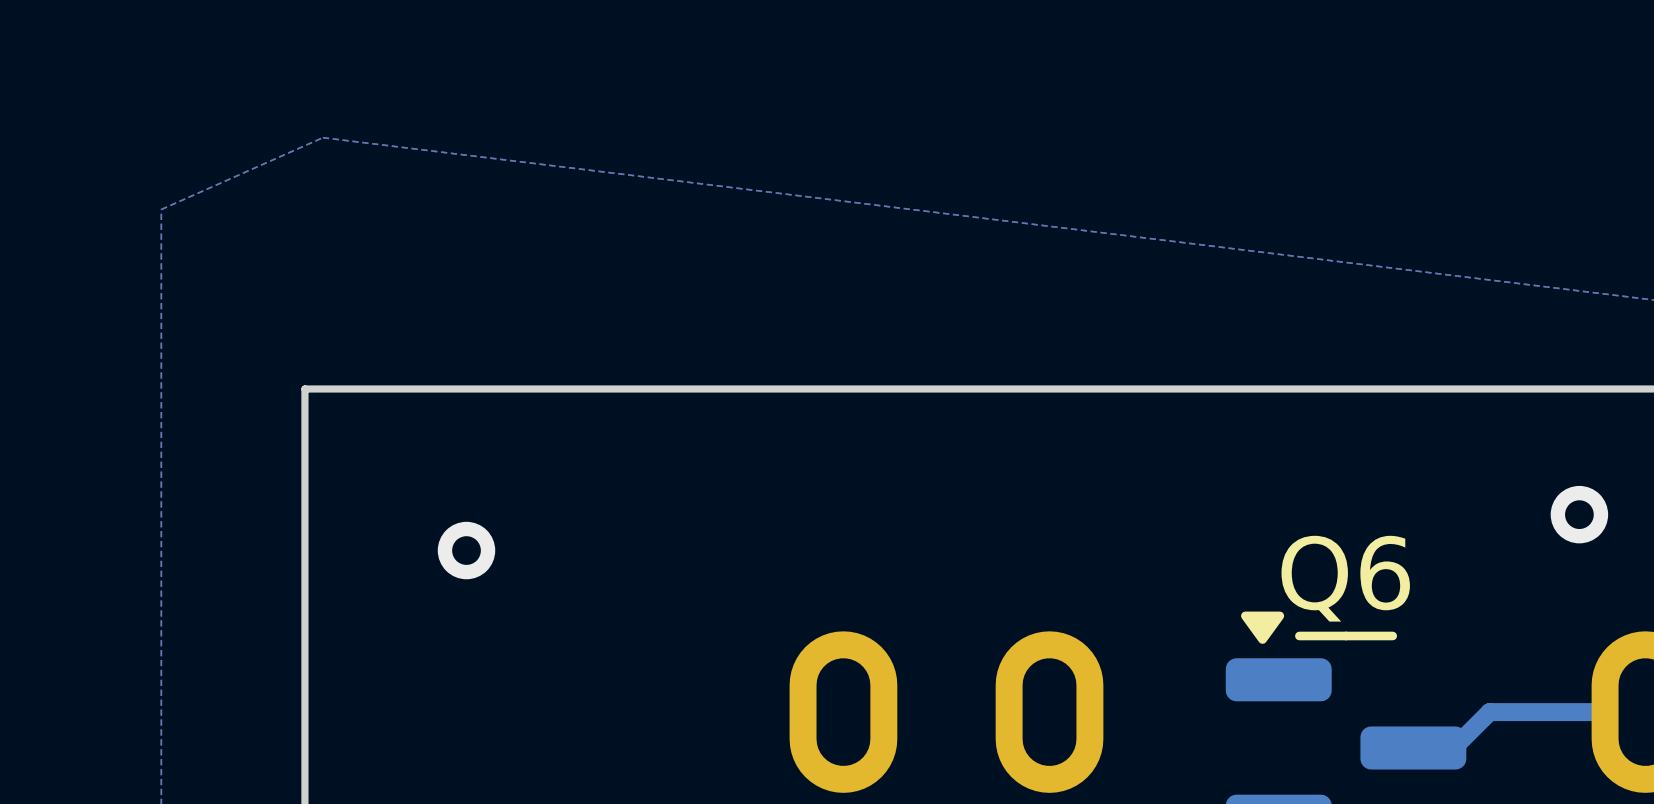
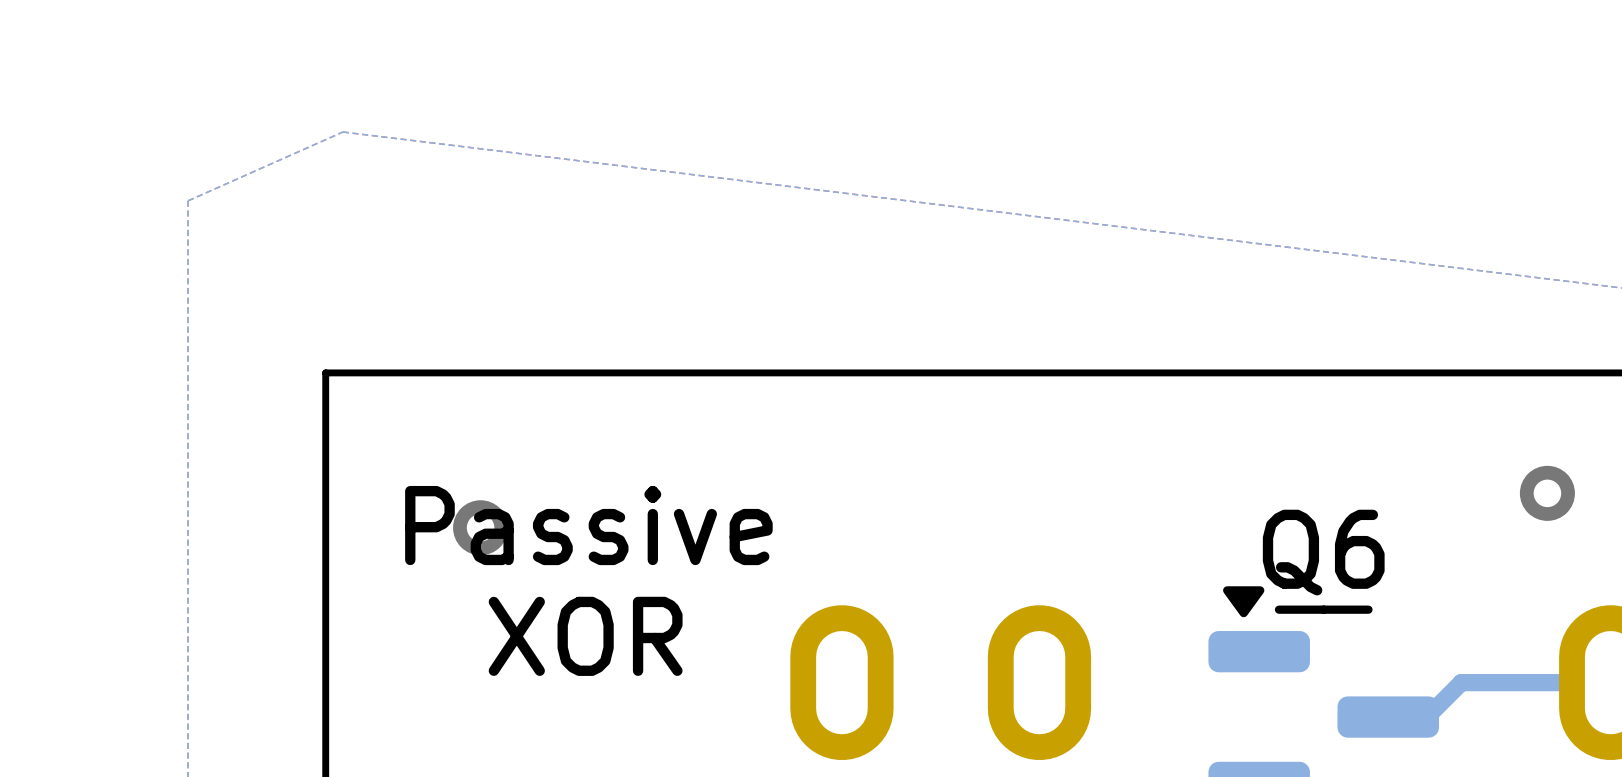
text: none -> Passive (588, 525)
text: none -> XOR (585, 636)

